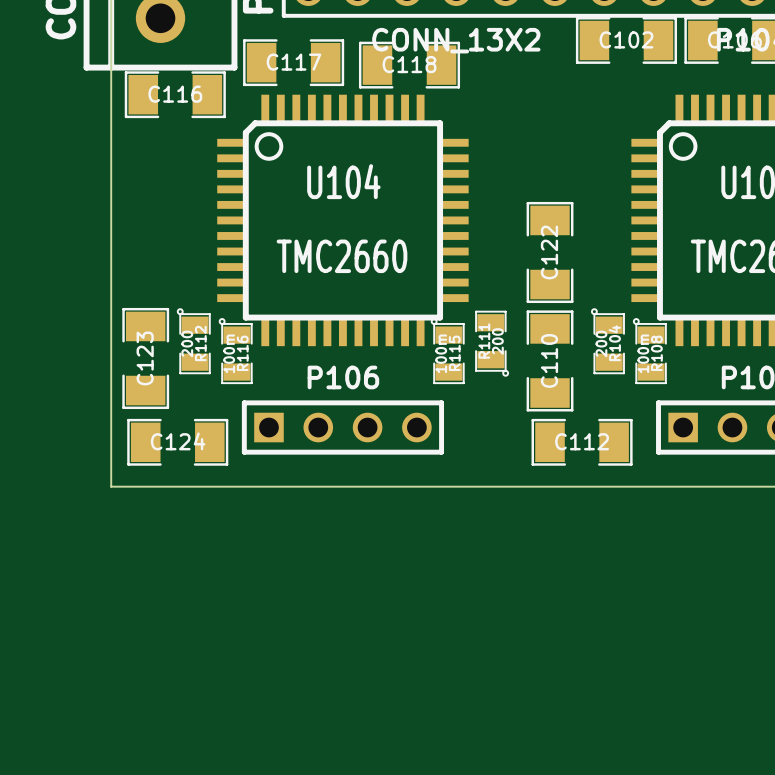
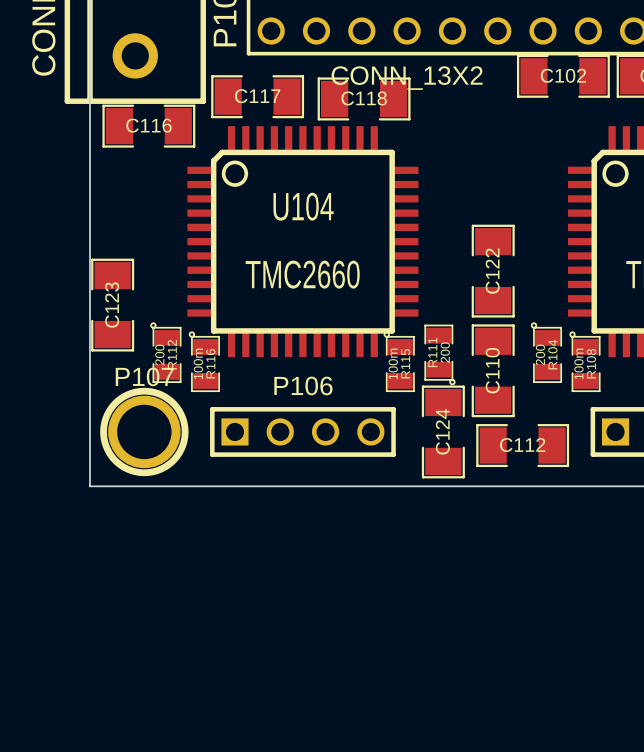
C123 position: (145, 358) -> (112, 305)
P107: none -> (144, 431)
C124 rotation: 0° (177, 442) -> 90° clockwise (443, 431)
C124 position: (177, 442) -> (443, 431)

